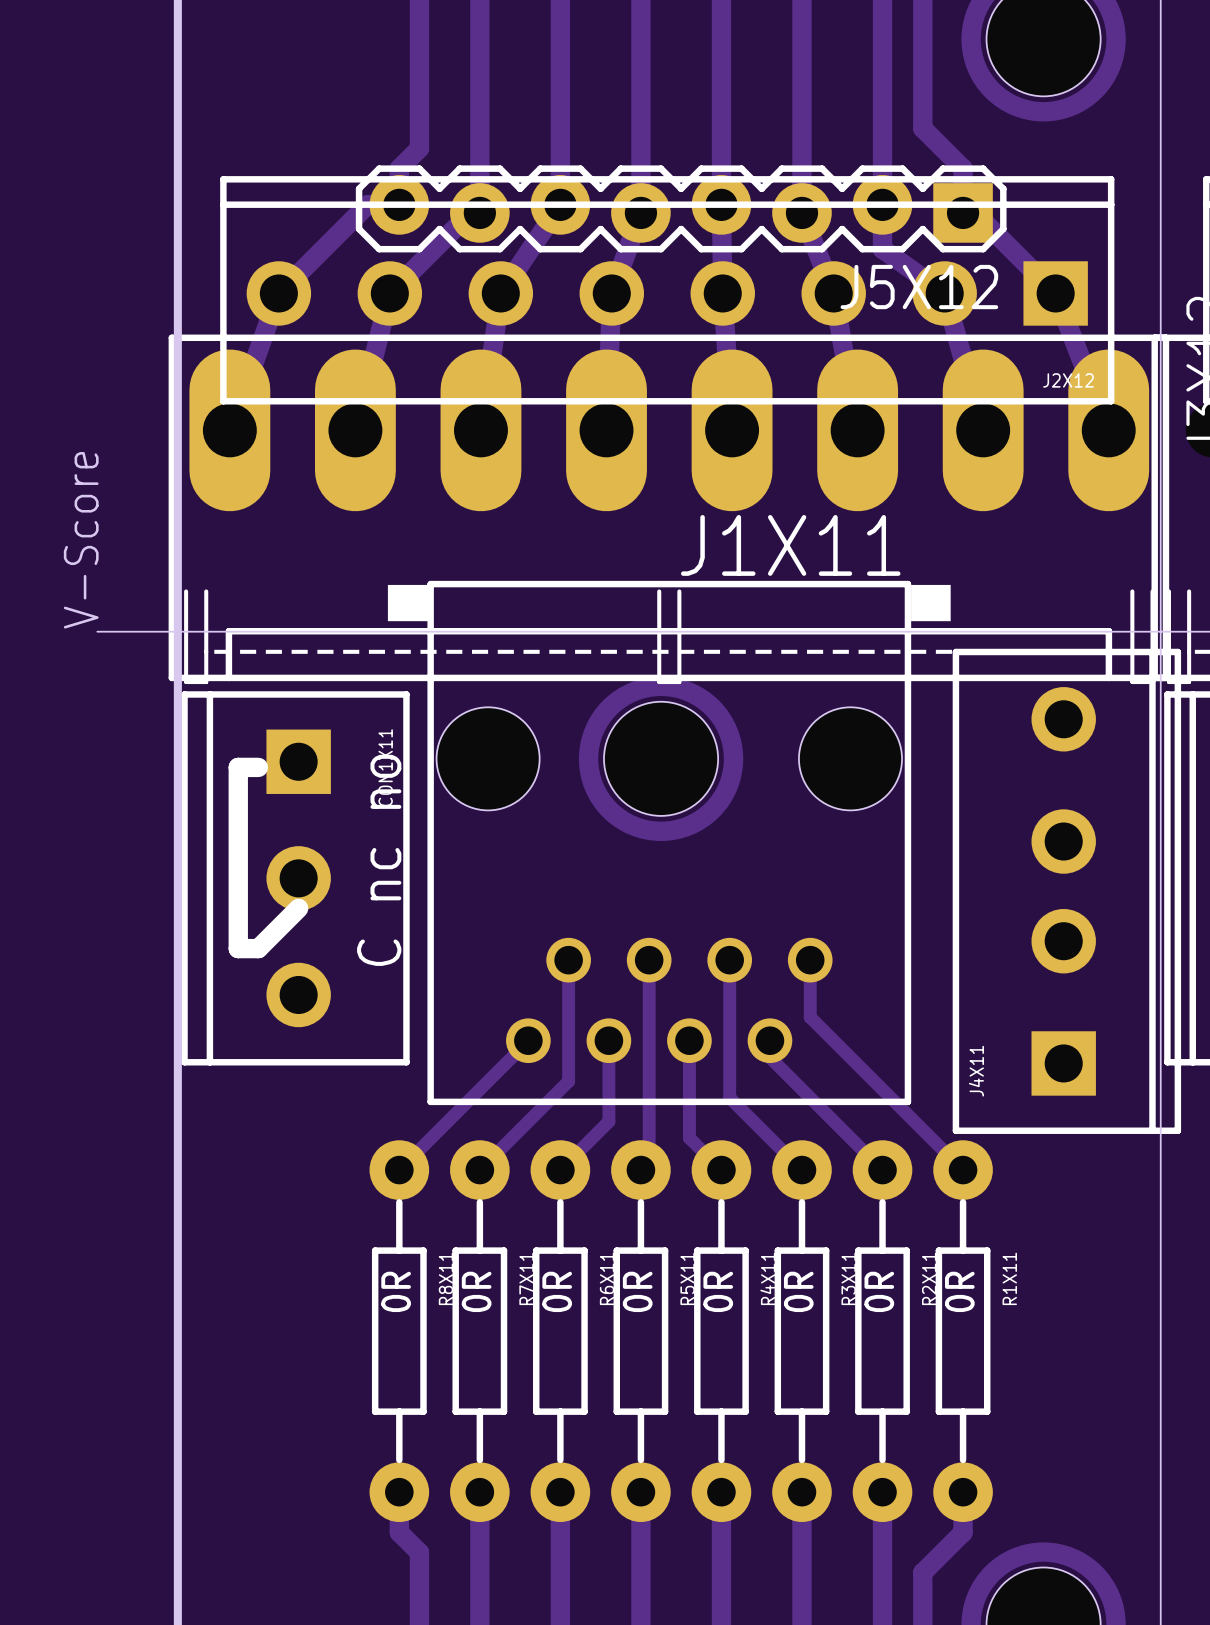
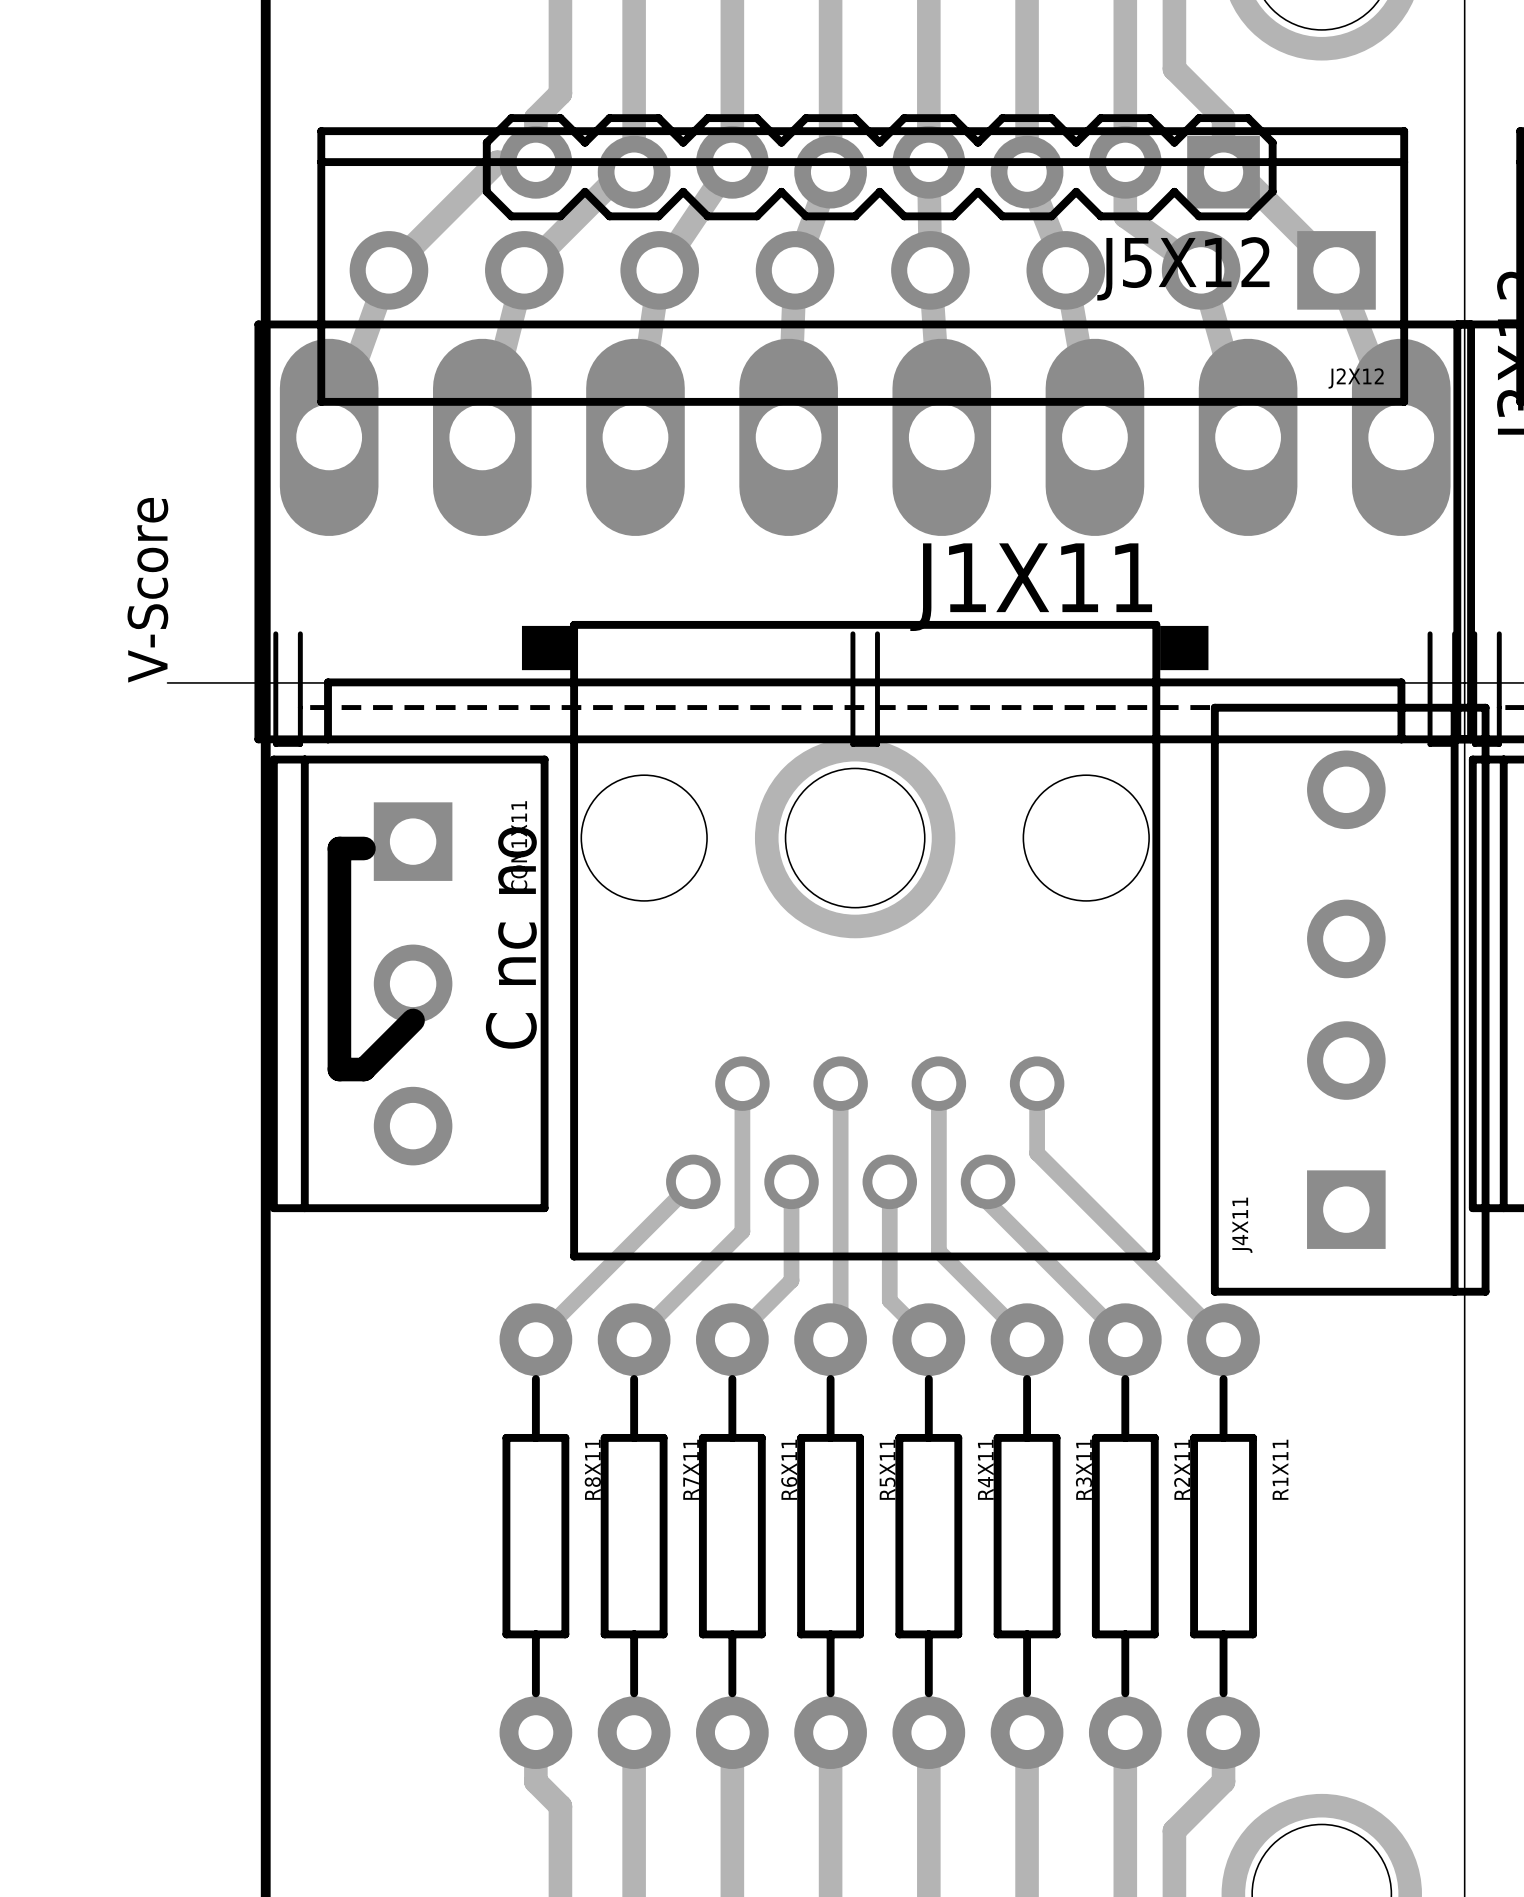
R8X11 value: 0R (396, 1291) -> none
R7X11 value: 0R (476, 1291) -> none
R6X11 value: 0R (557, 1291) -> none
R5X11 value: 0R (637, 1291) -> none
R4X11 value: 0R (718, 1291) -> none
R3X11 value: 0R (798, 1291) -> none
R2X11 value: 0R (879, 1291) -> none
R1X11 value: 0R (959, 1291) -> none

